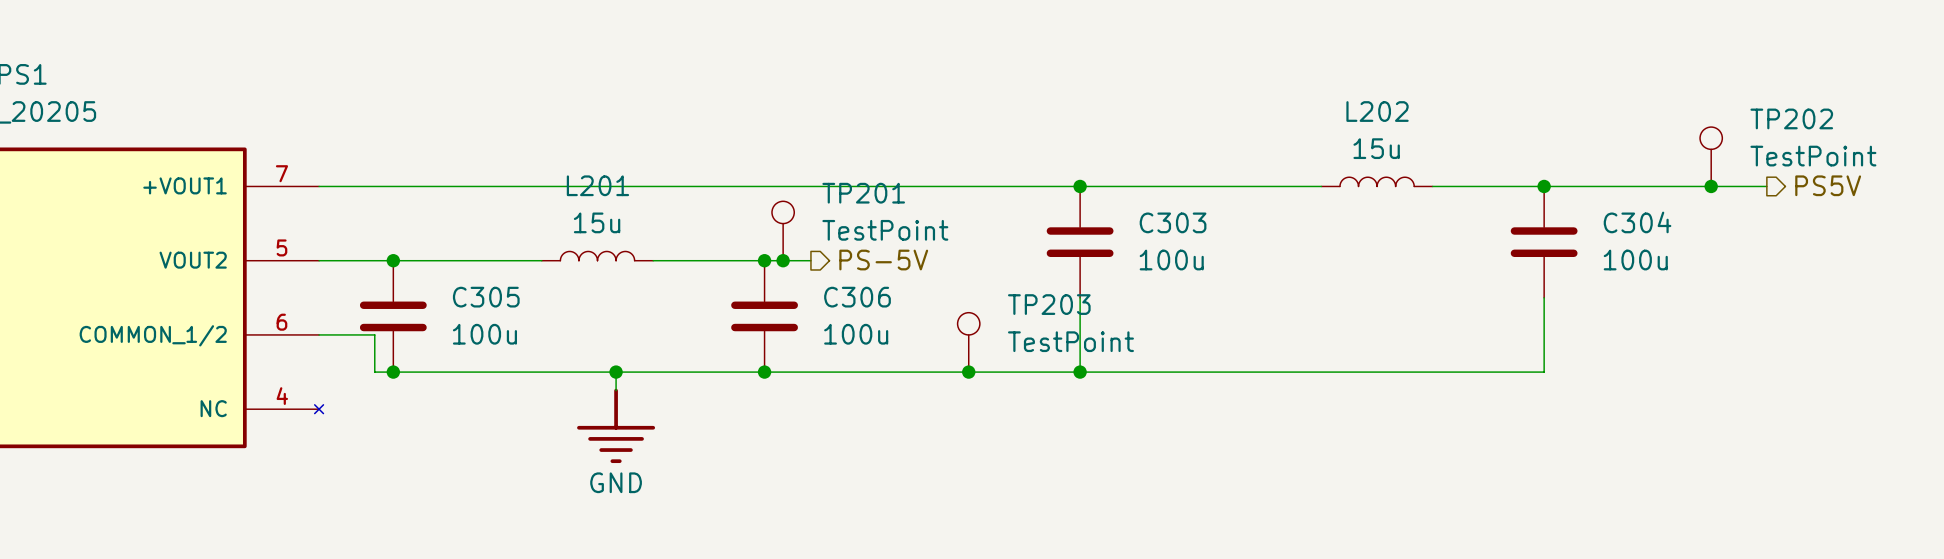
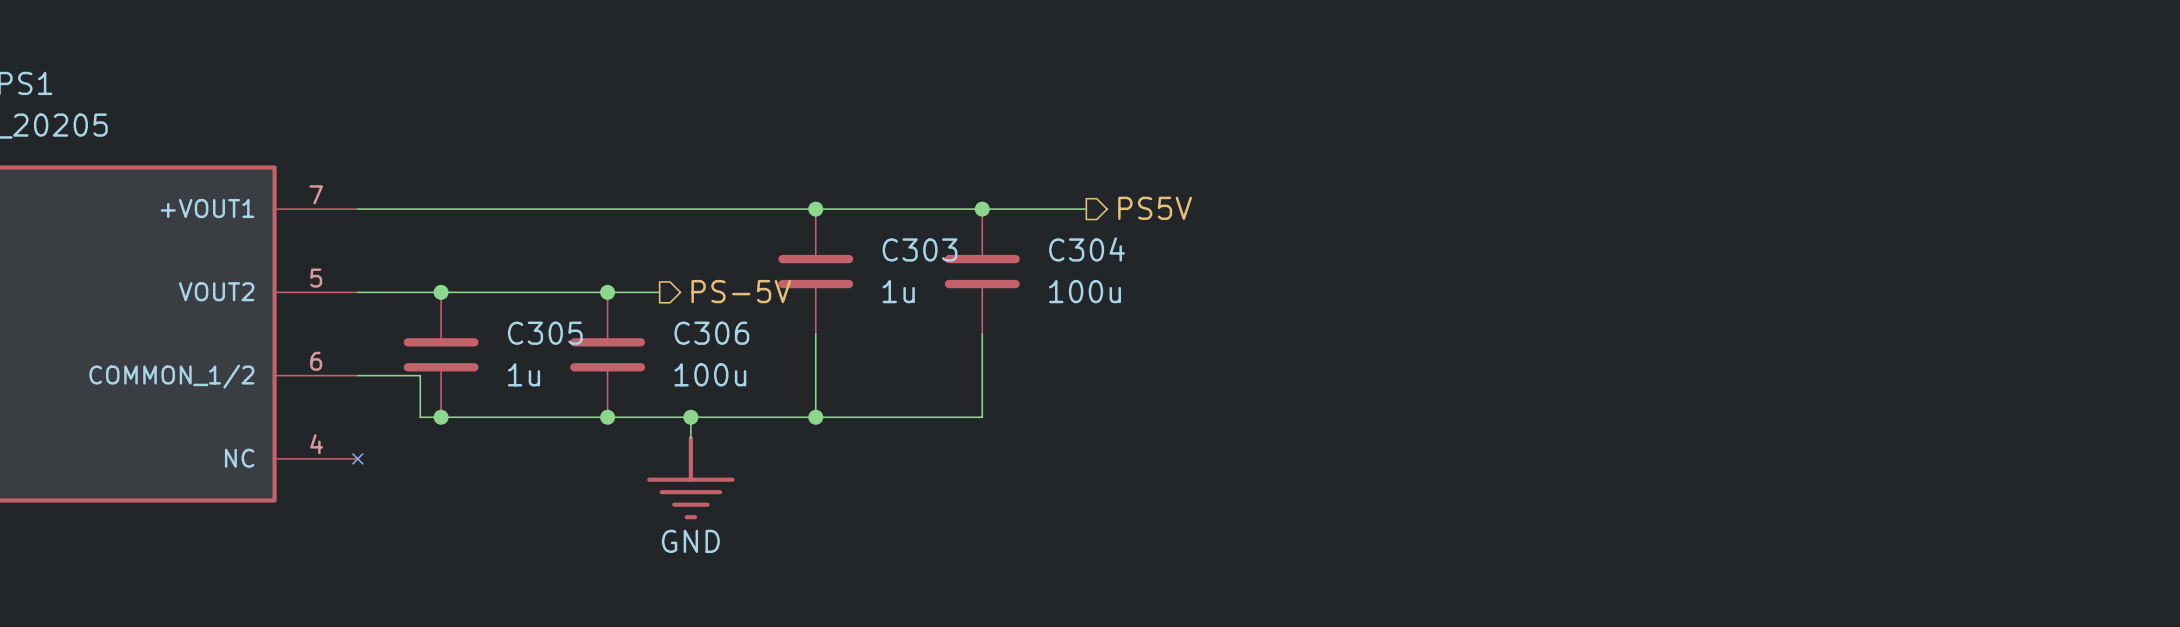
TP202: TestPoint (1711, 156) -> none
L202: 15u (1377, 181) -> none
hierarchical label: none -> PS5V (1155, 208)
hierarchical label: PS5V (1828, 185) -> none
junction: none -> (815, 209)
junction: none -> (982, 209)
wire: (968, 186) (1321, 186) -> none
junction: (1080, 186) -> none
wire: (1432, 186) (1766, 186) -> none
junction: (1544, 186) -> none
junction: (1711, 186) -> none
TP201: TestPoint (783, 231) -> none
C303 position: (1080, 242) -> (815, 271)
C304 position: (1544, 242) -> (982, 271)
L201: 15u (597, 256) -> none
wire: none -> (607, 292) (659, 292)
junction: none -> (607, 292)
wire: (653, 260) (810, 260) -> none
junction: (764, 260) -> none
junction: (783, 260) -> none
hierarchical label position: PS-5V (883, 260) -> PS-5V (741, 291)
C303 value: 100u (1171, 260) -> 1u (898, 291)
wire: (1080, 297) (1080, 372) -> (815, 333) (815, 417)
wire: (1544, 297) (1544, 372) (875, 372) -> (982, 333) (982, 417)
C306 position: (764, 316) -> (607, 354)
C305 value: 100u (484, 334) -> 1u (524, 374)
TP203: TestPoint (968, 342) -> none
junction: none -> (607, 417)
junction position: (764, 372) -> (815, 417)
junction: (968, 372) -> none
junction: (1080, 372) -> none

